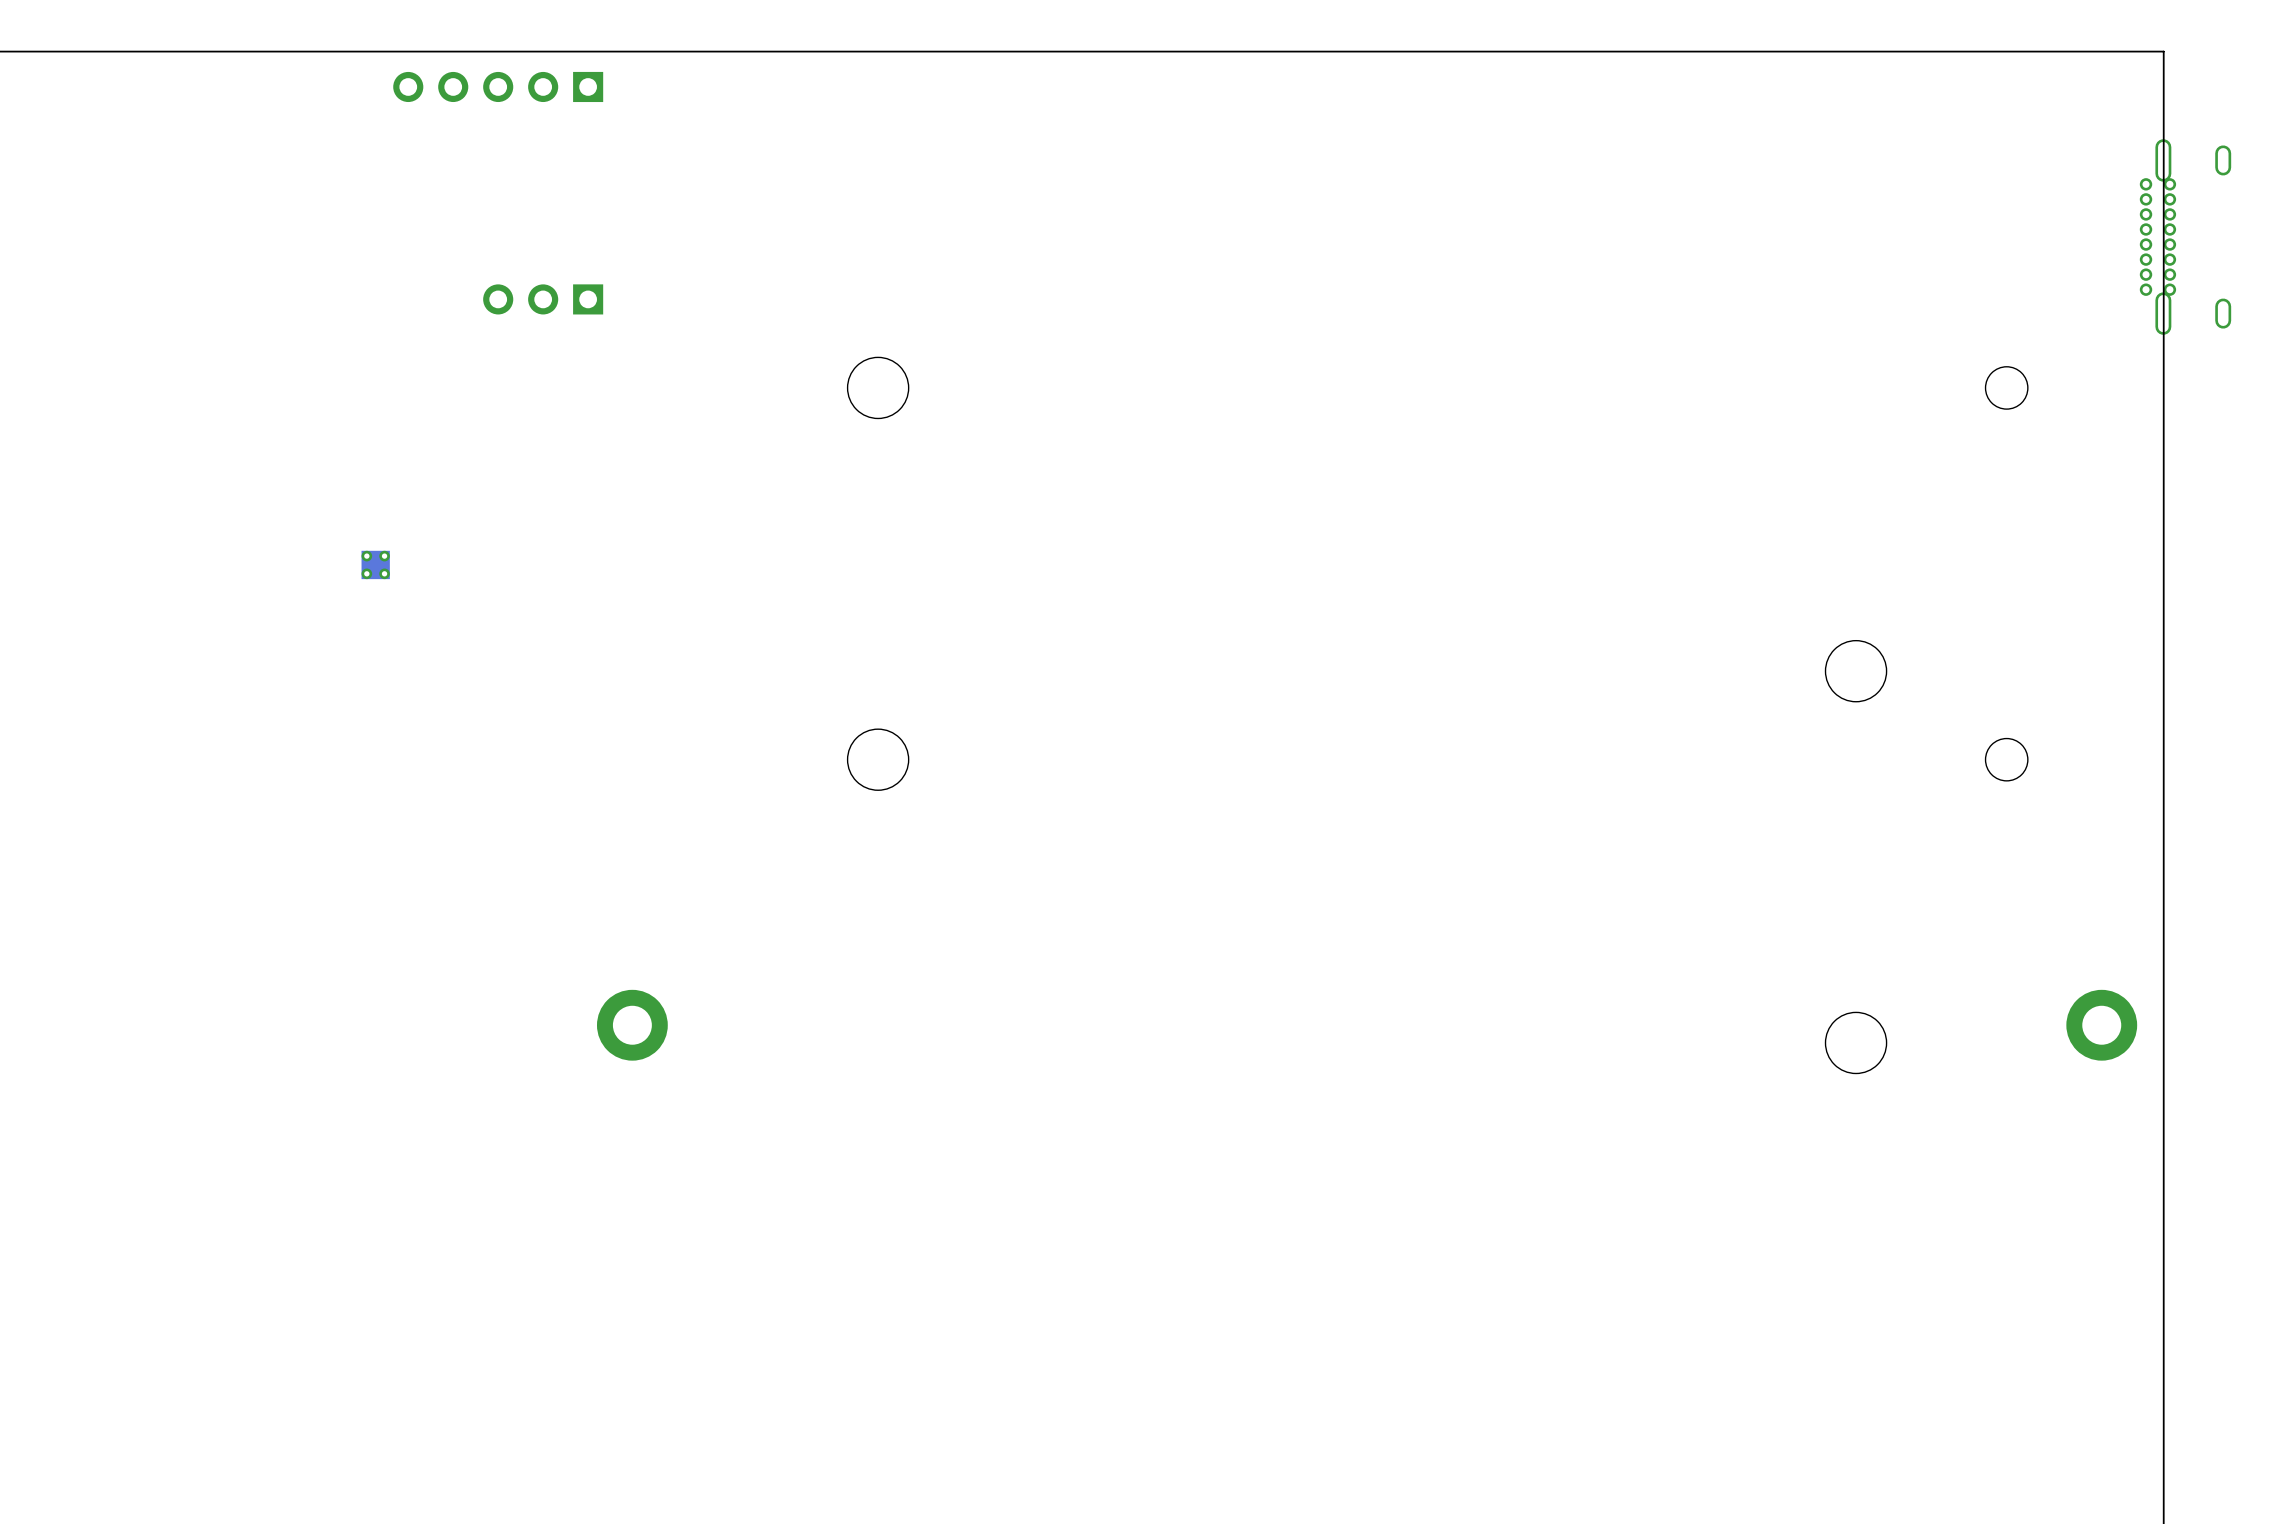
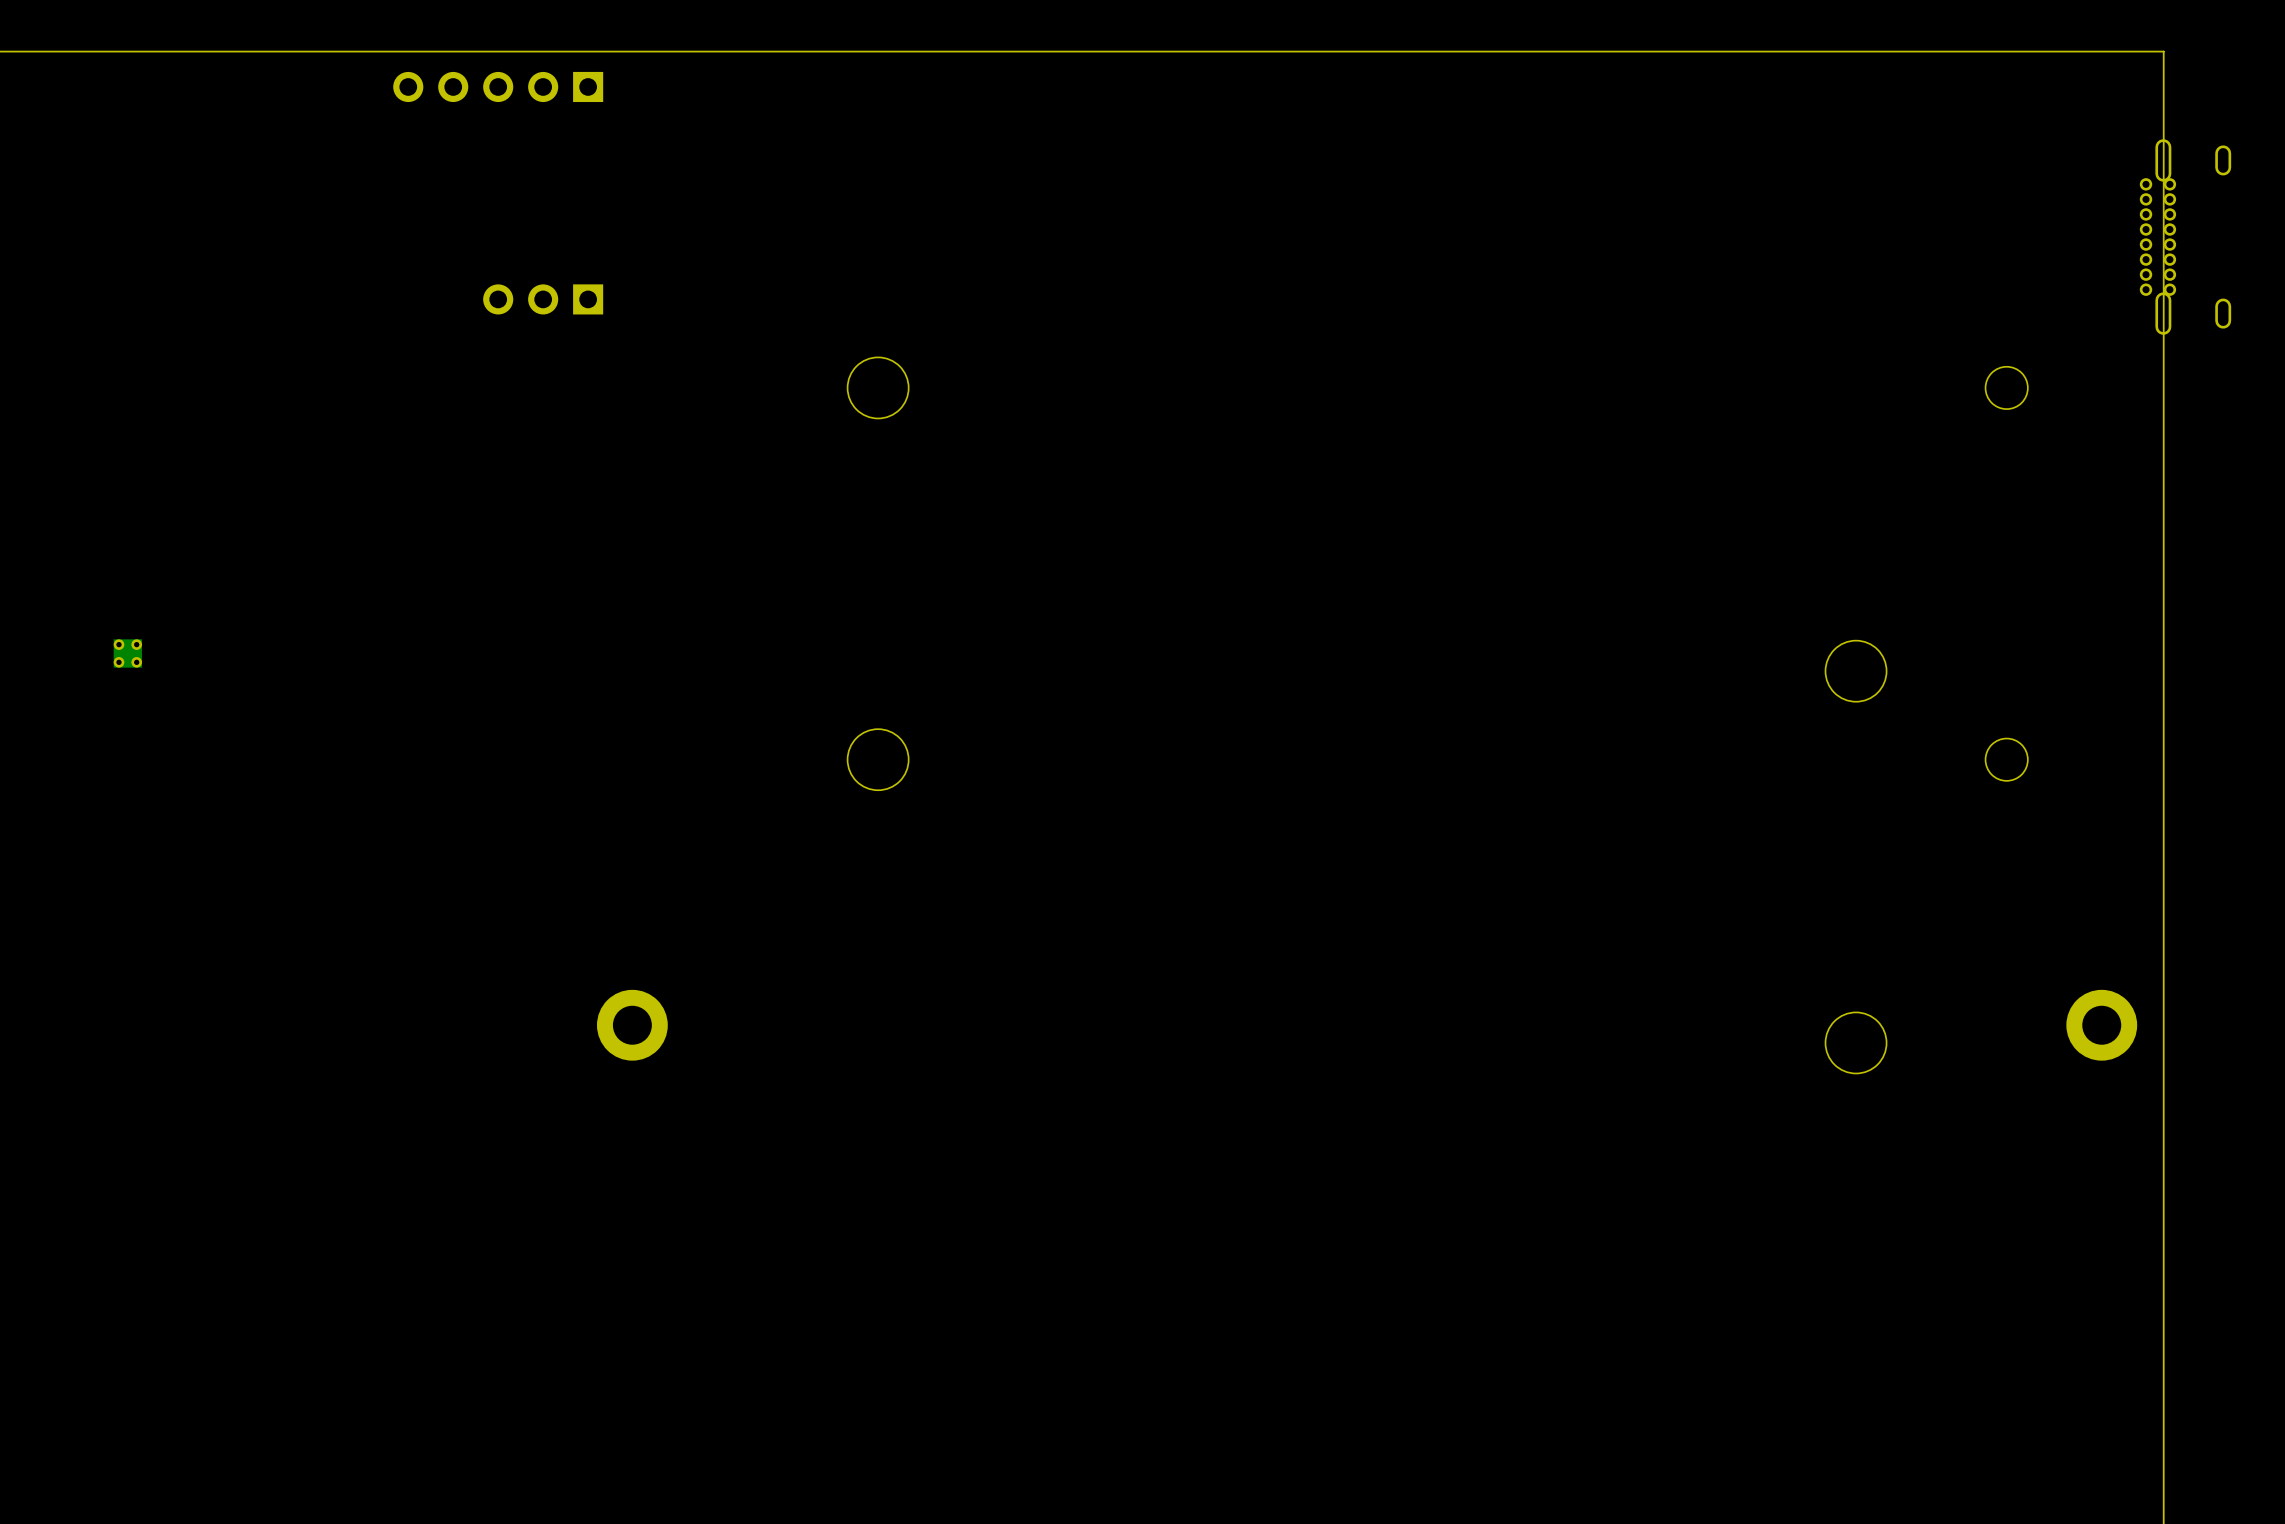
part position: (375, 564) -> (127, 653)

